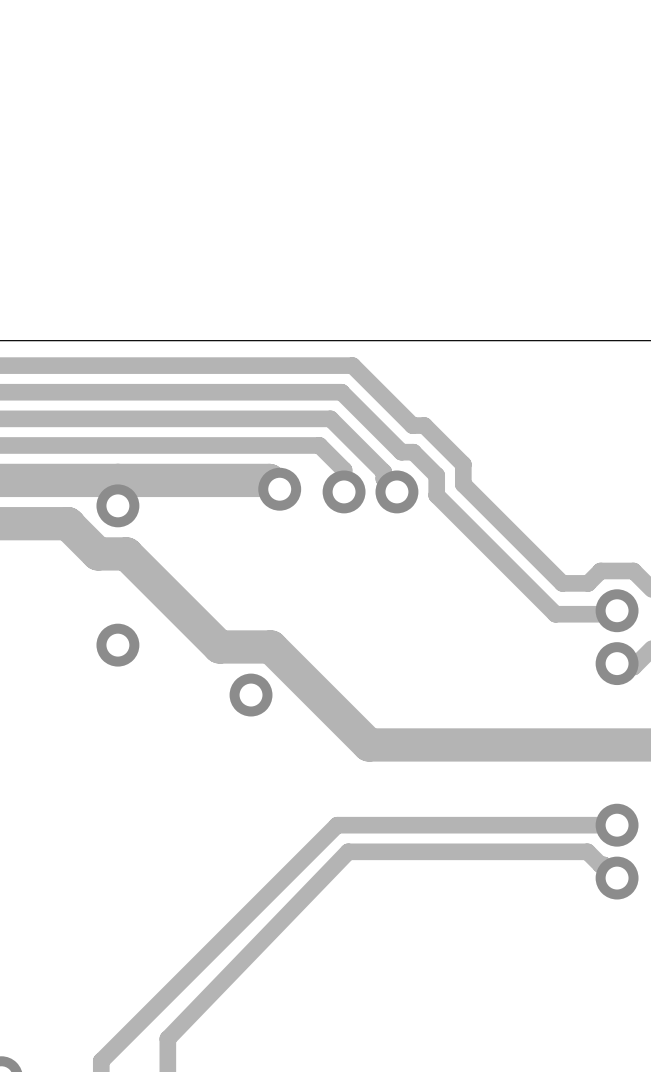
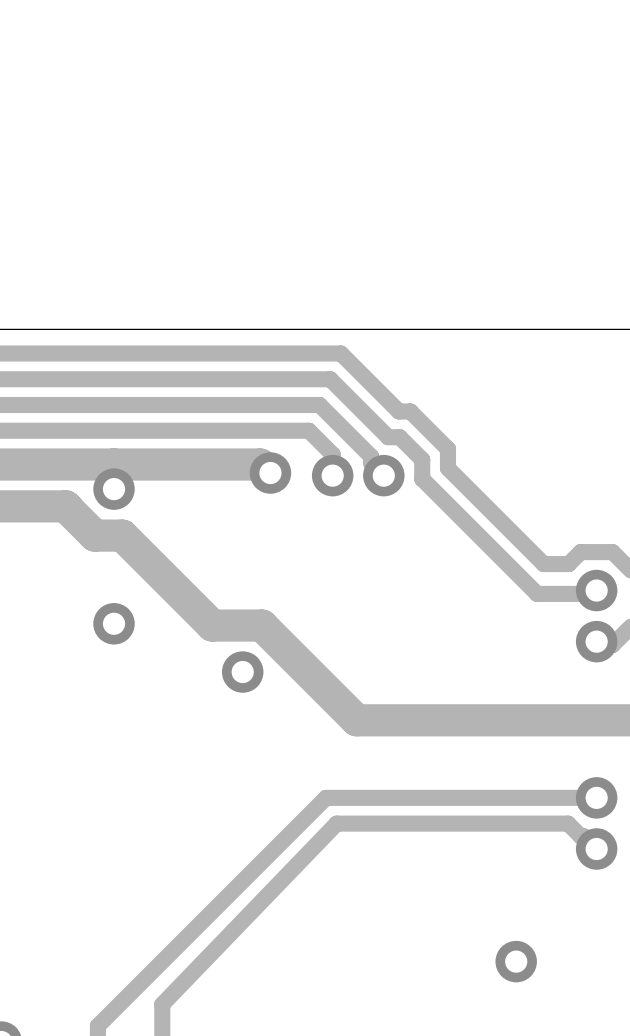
via: none -> (516, 961)

